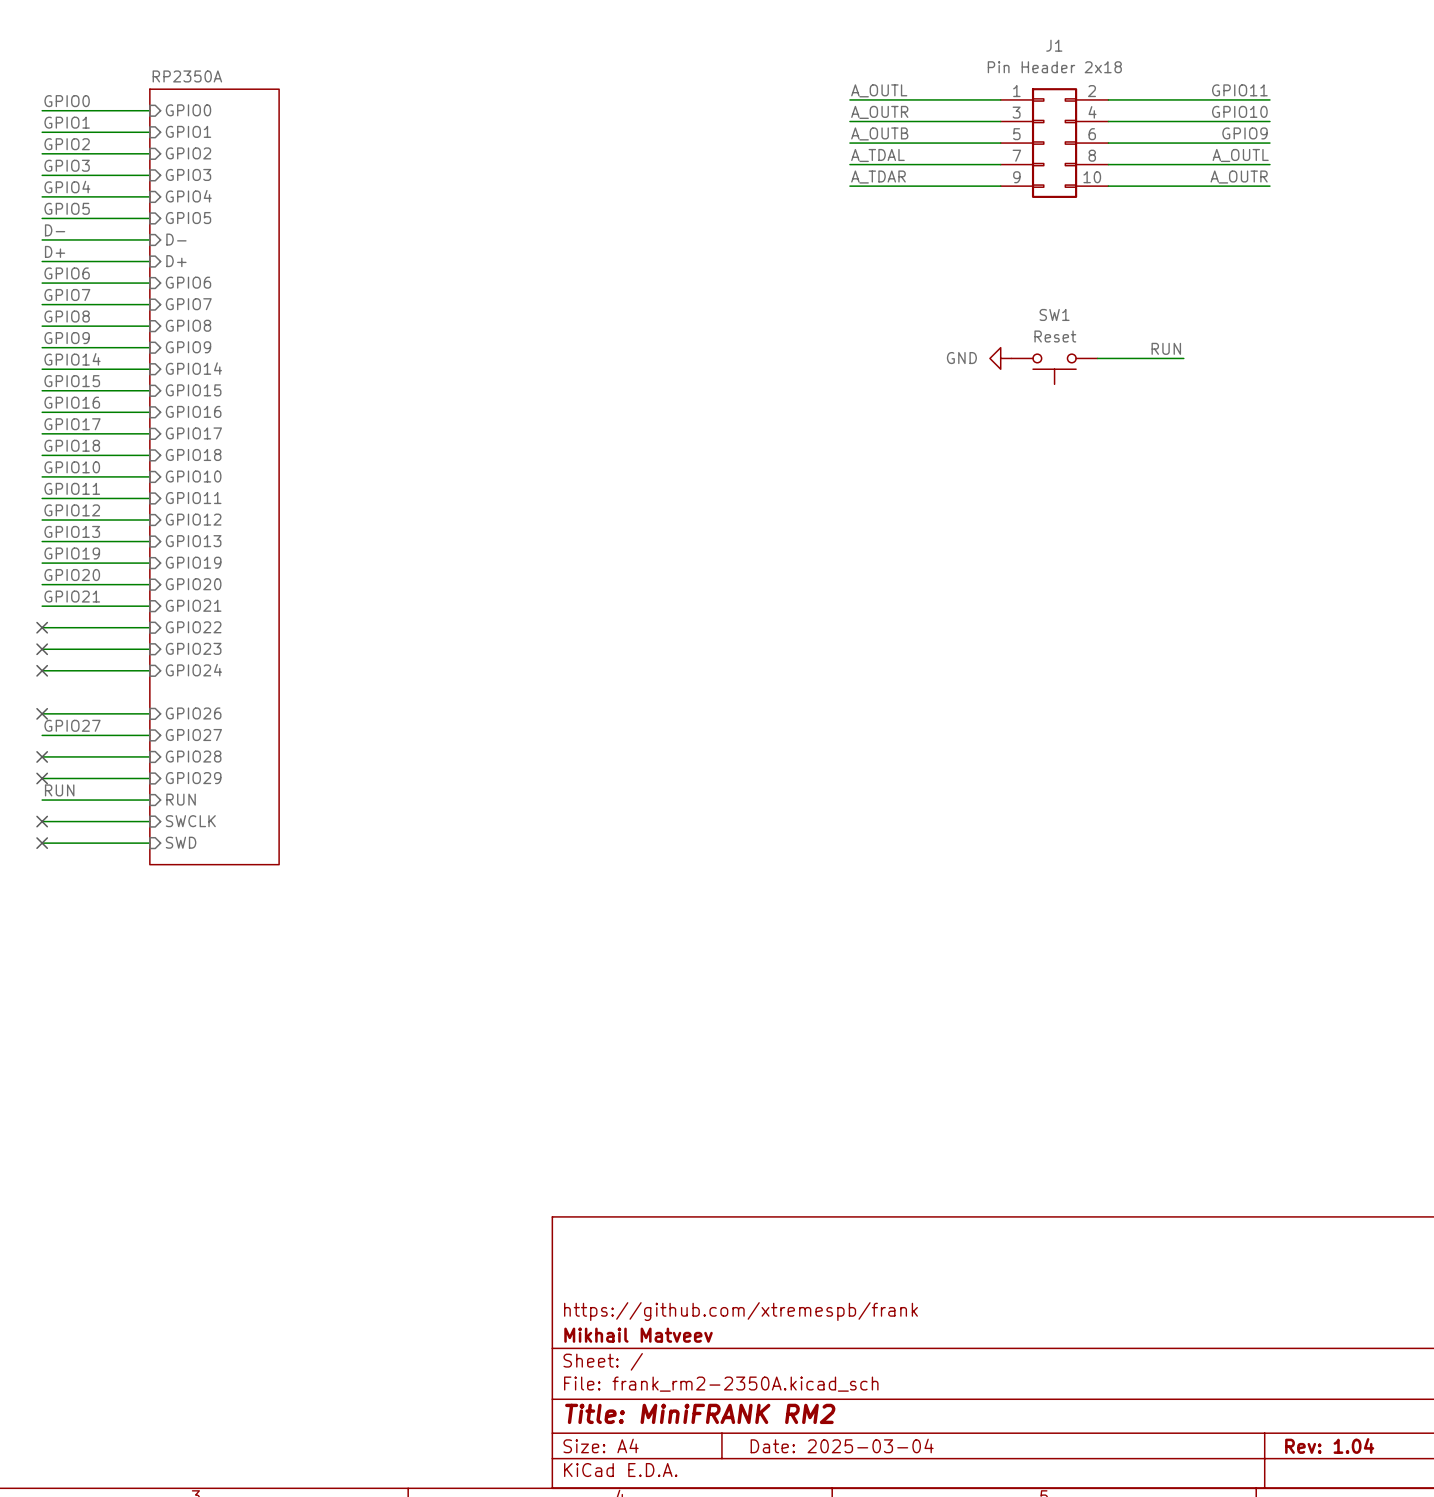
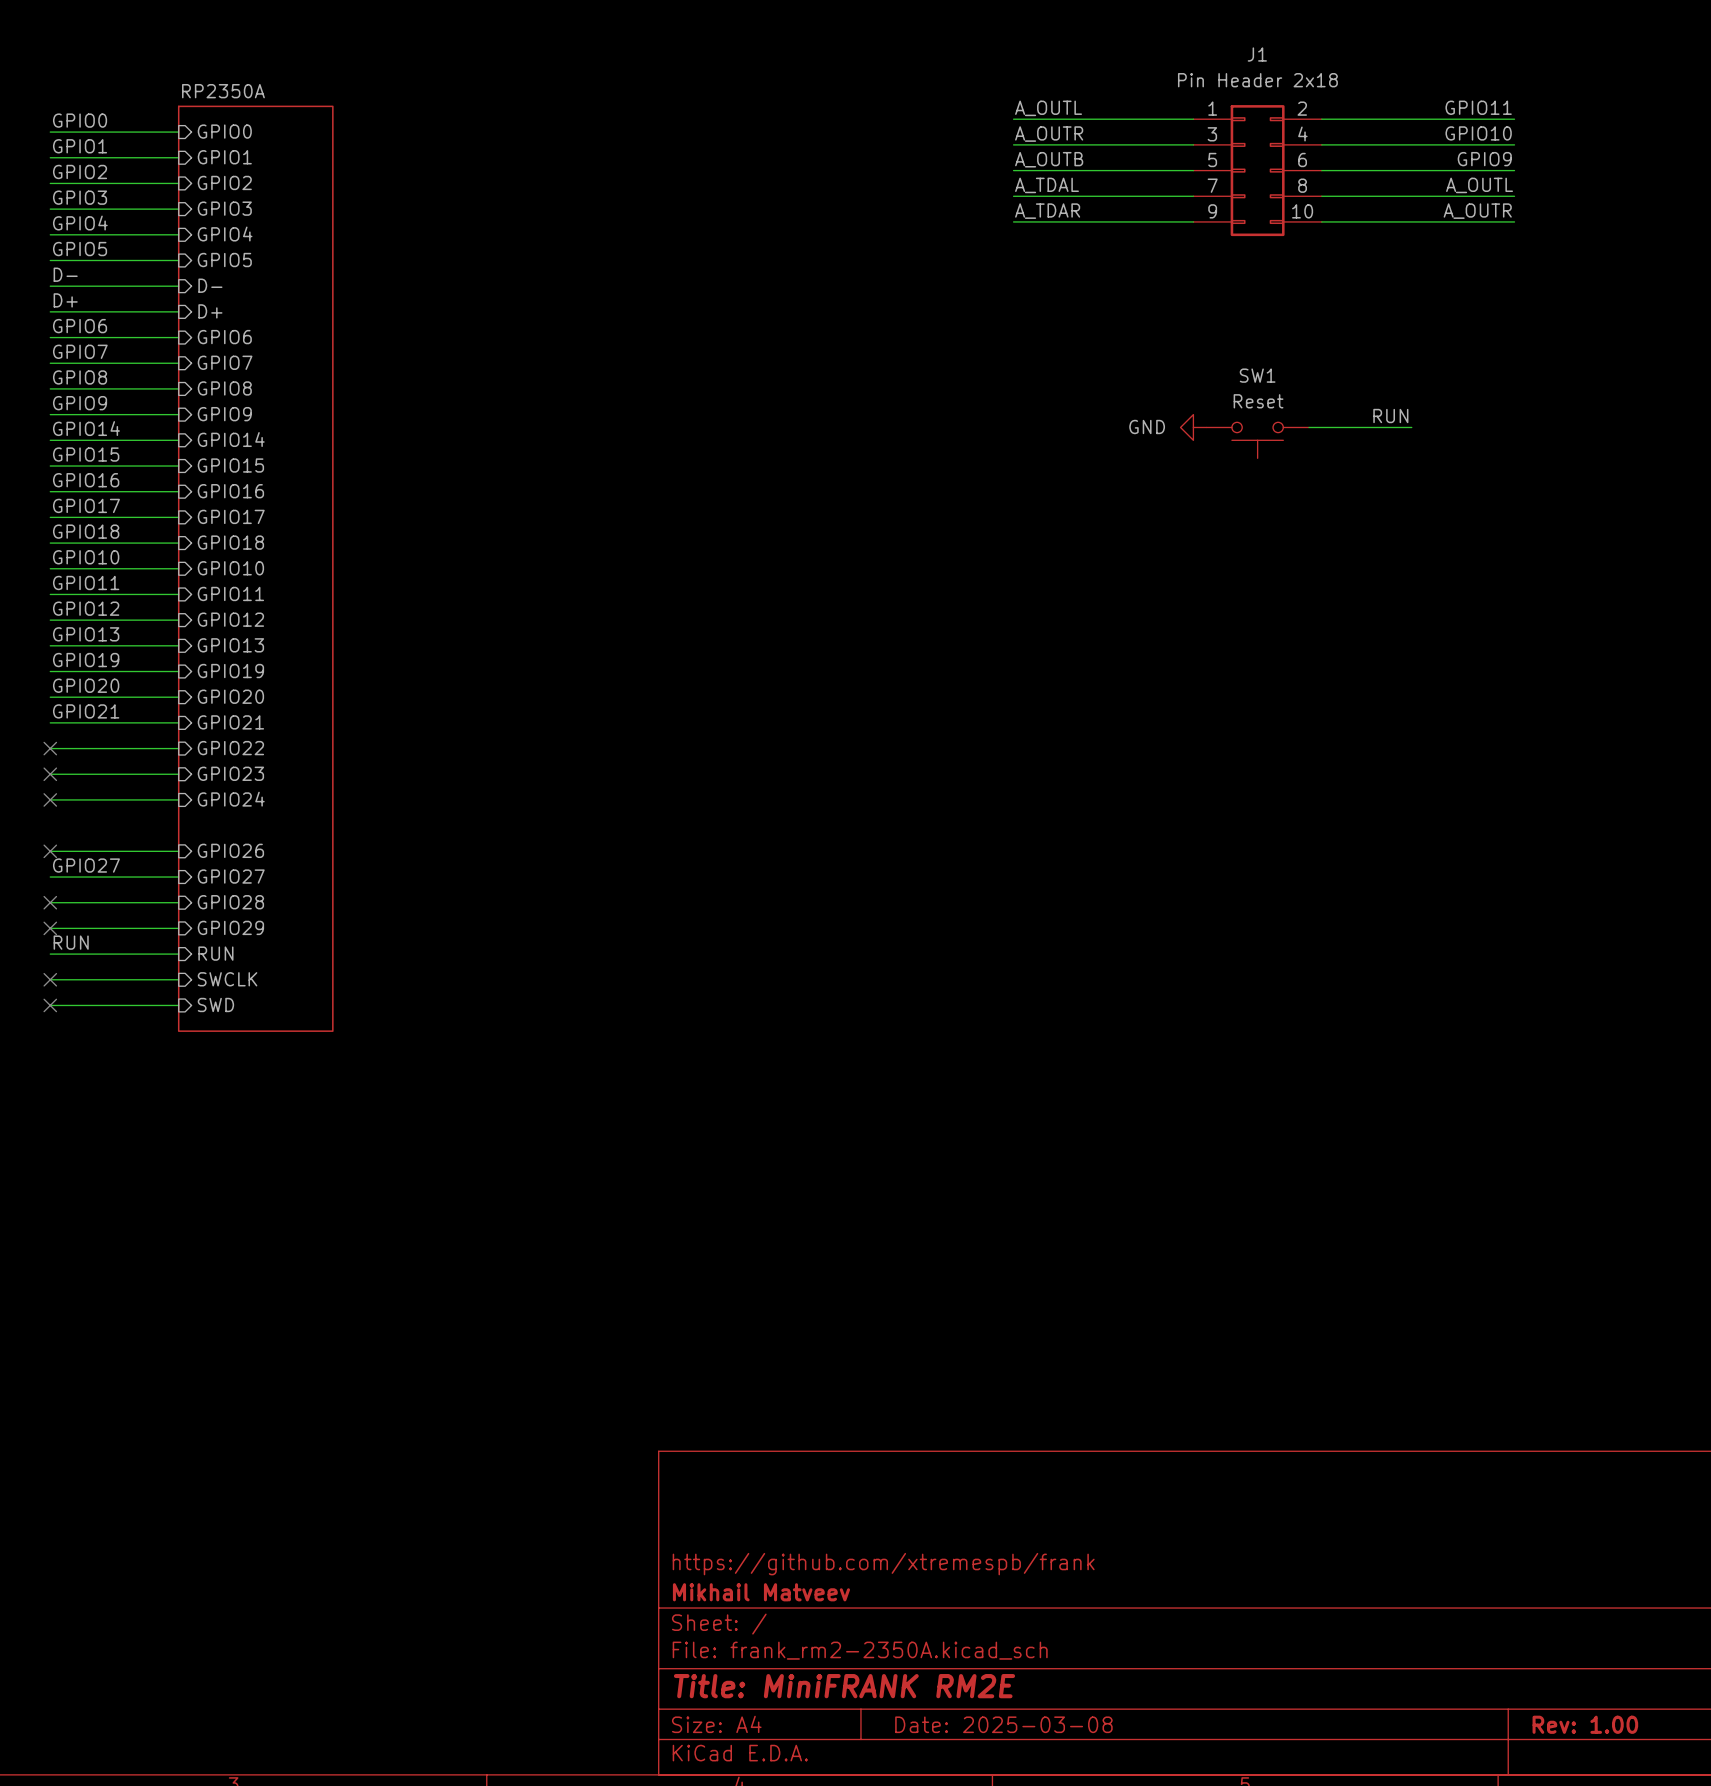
title block: Title: MiniFRANK RM2 (700, 1413) -> Title: MiniFRANK RM2E (844, 1686)
title block: Date: 2025-03-04 (842, 1445) -> Date: 2025-03-08 (1003, 1724)
title block: Rev: 1.04 (1329, 1445) -> Rev: 1.00 (1585, 1724)

